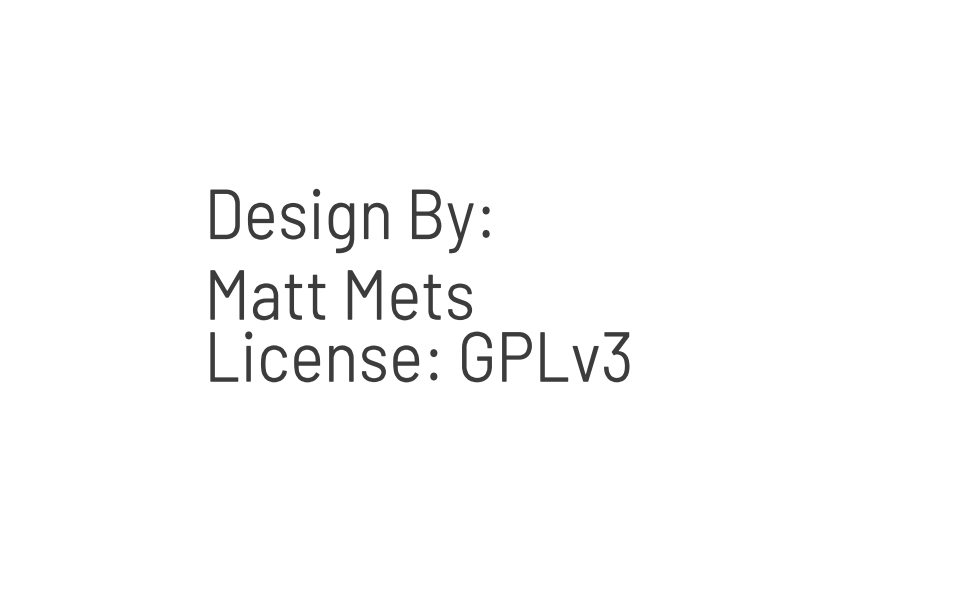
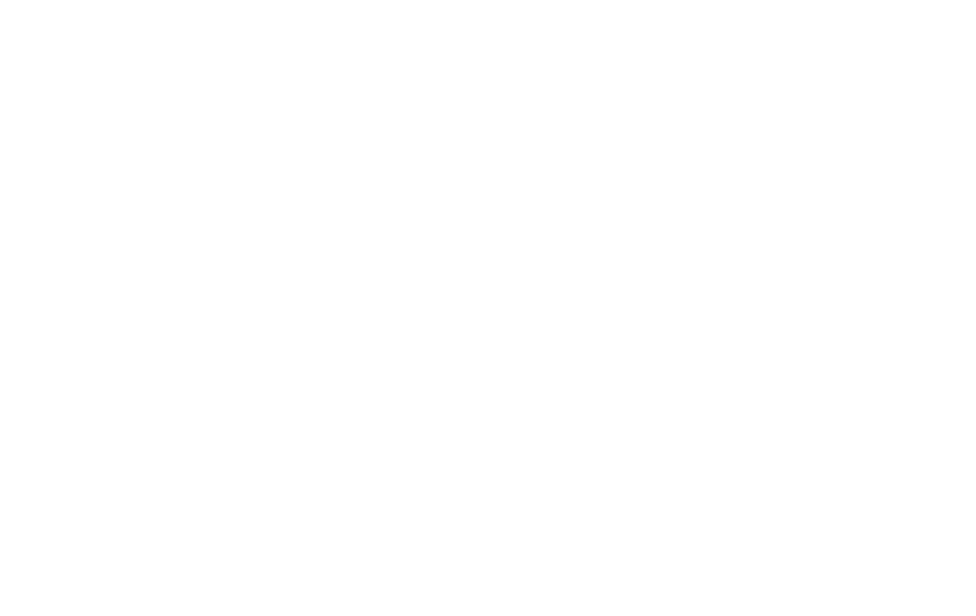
text: Design By: (350, 221) -> none
text: Matt Mets (341, 295) -> none
text: License: GPLv3 (419, 356) -> none

